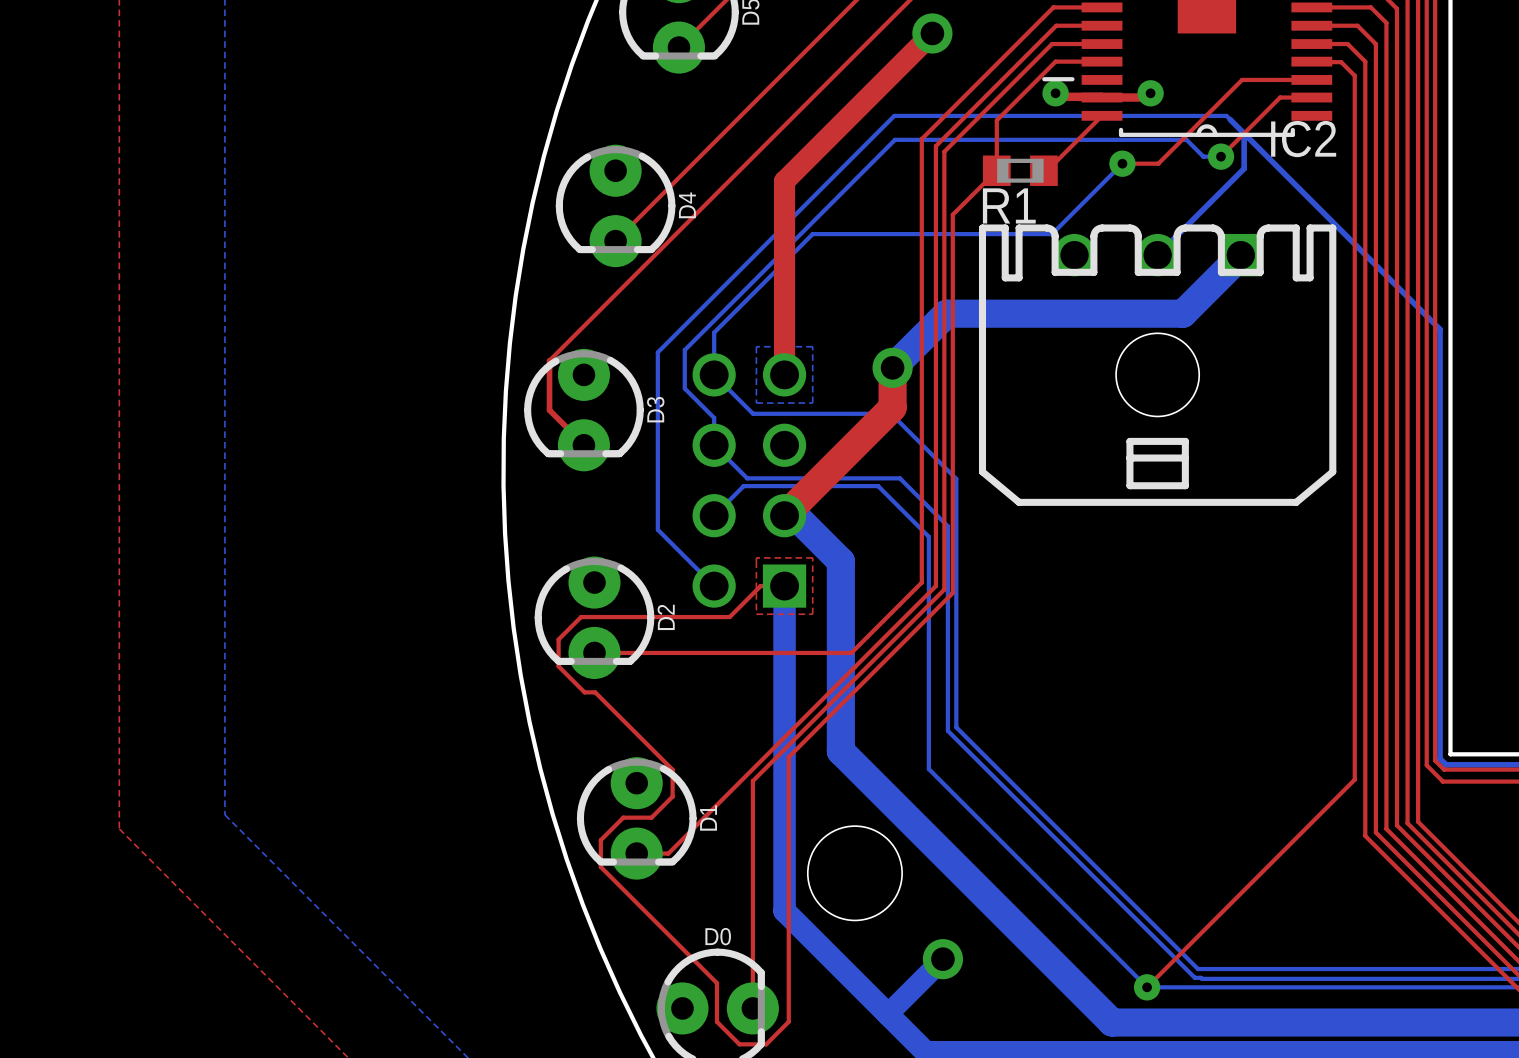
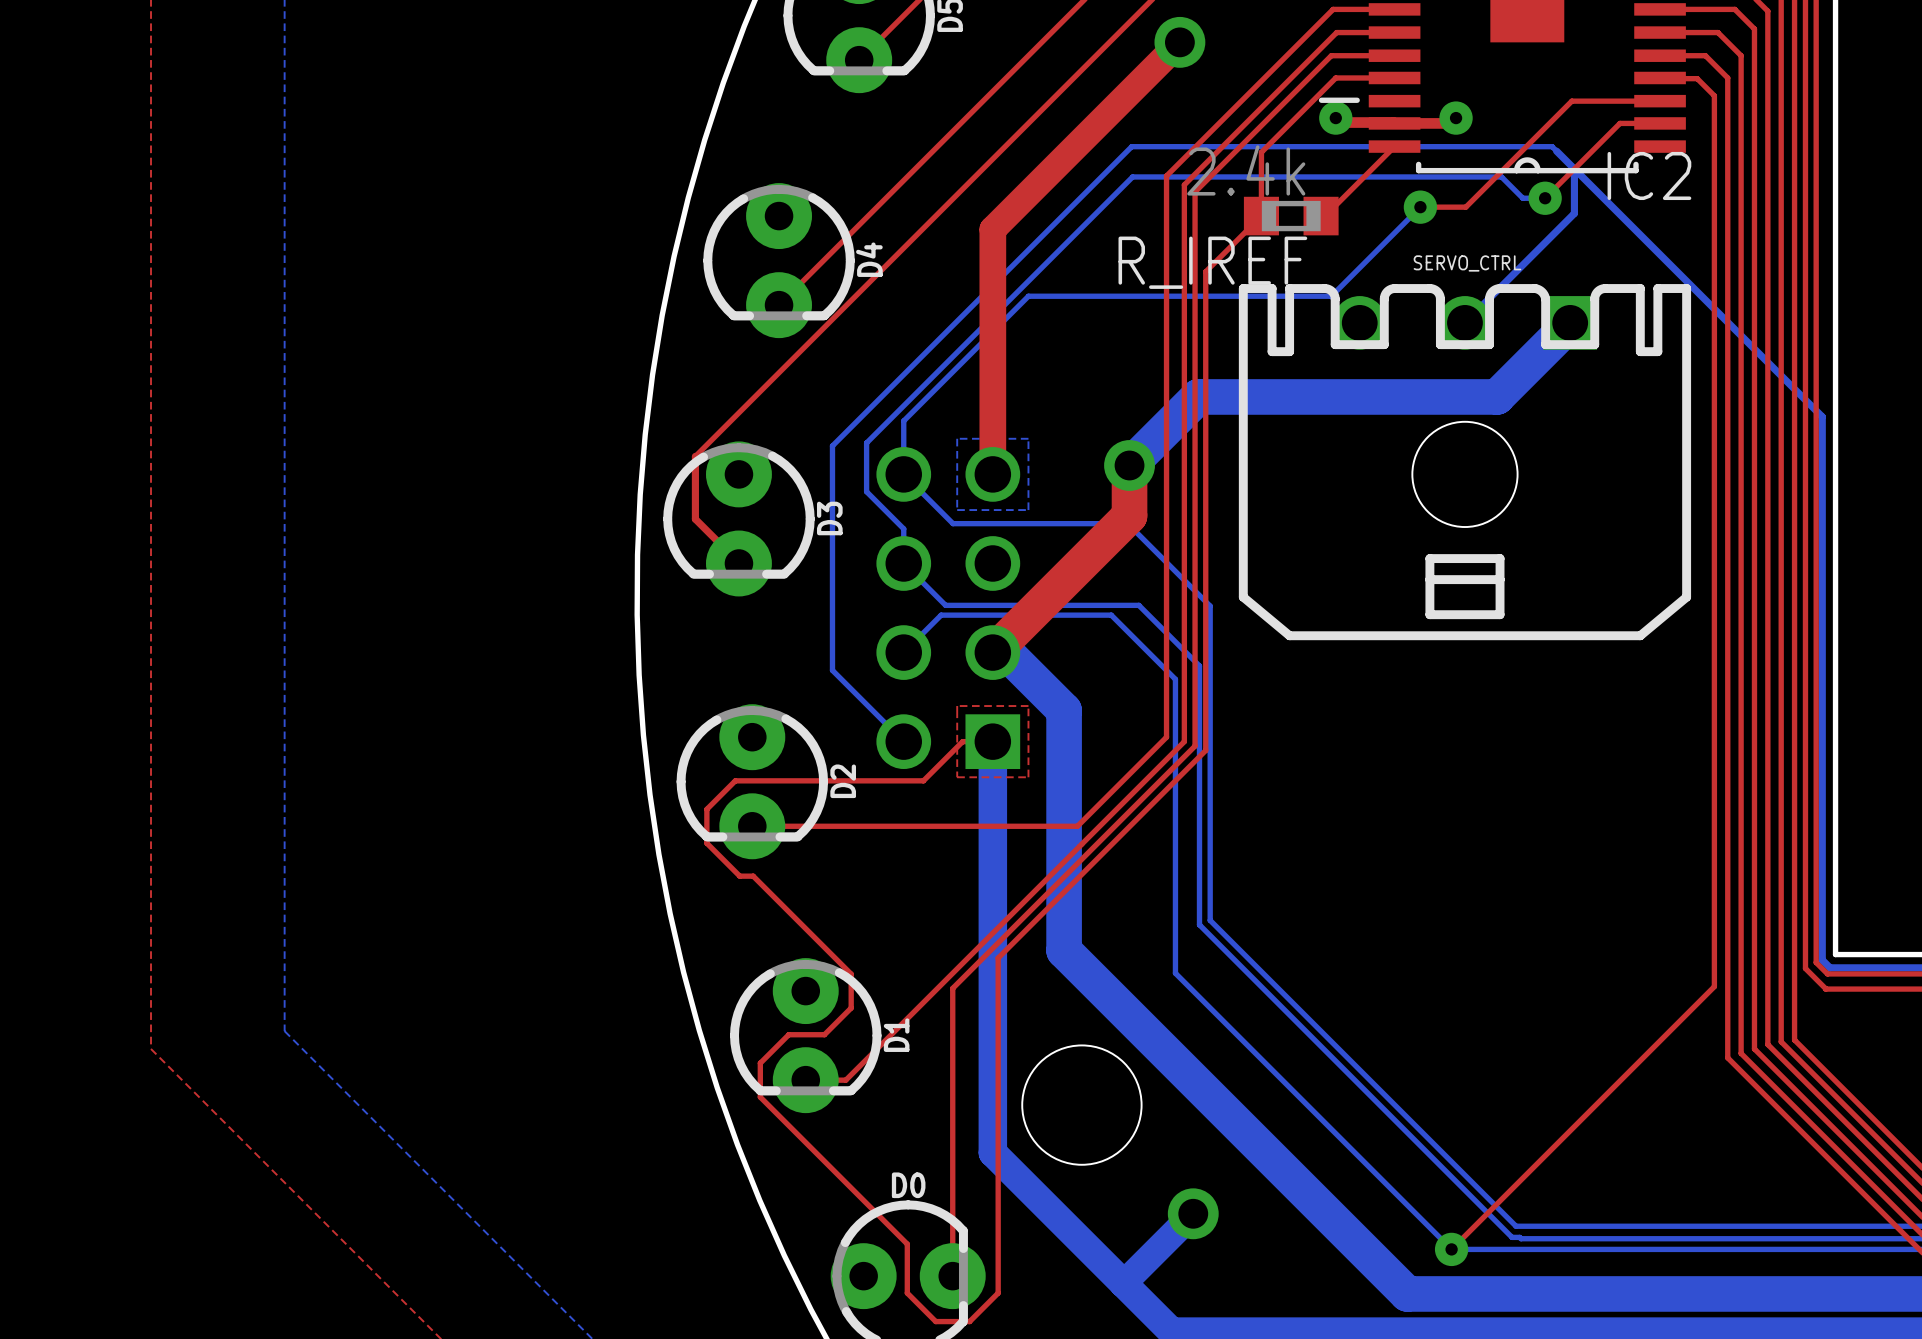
R1 value: none -> 2.4k (1246, 170)
R1 name: R1 (1009, 205) -> R_IREF (1212, 262)
text: none -> SERVO_CTRL (1467, 263)

